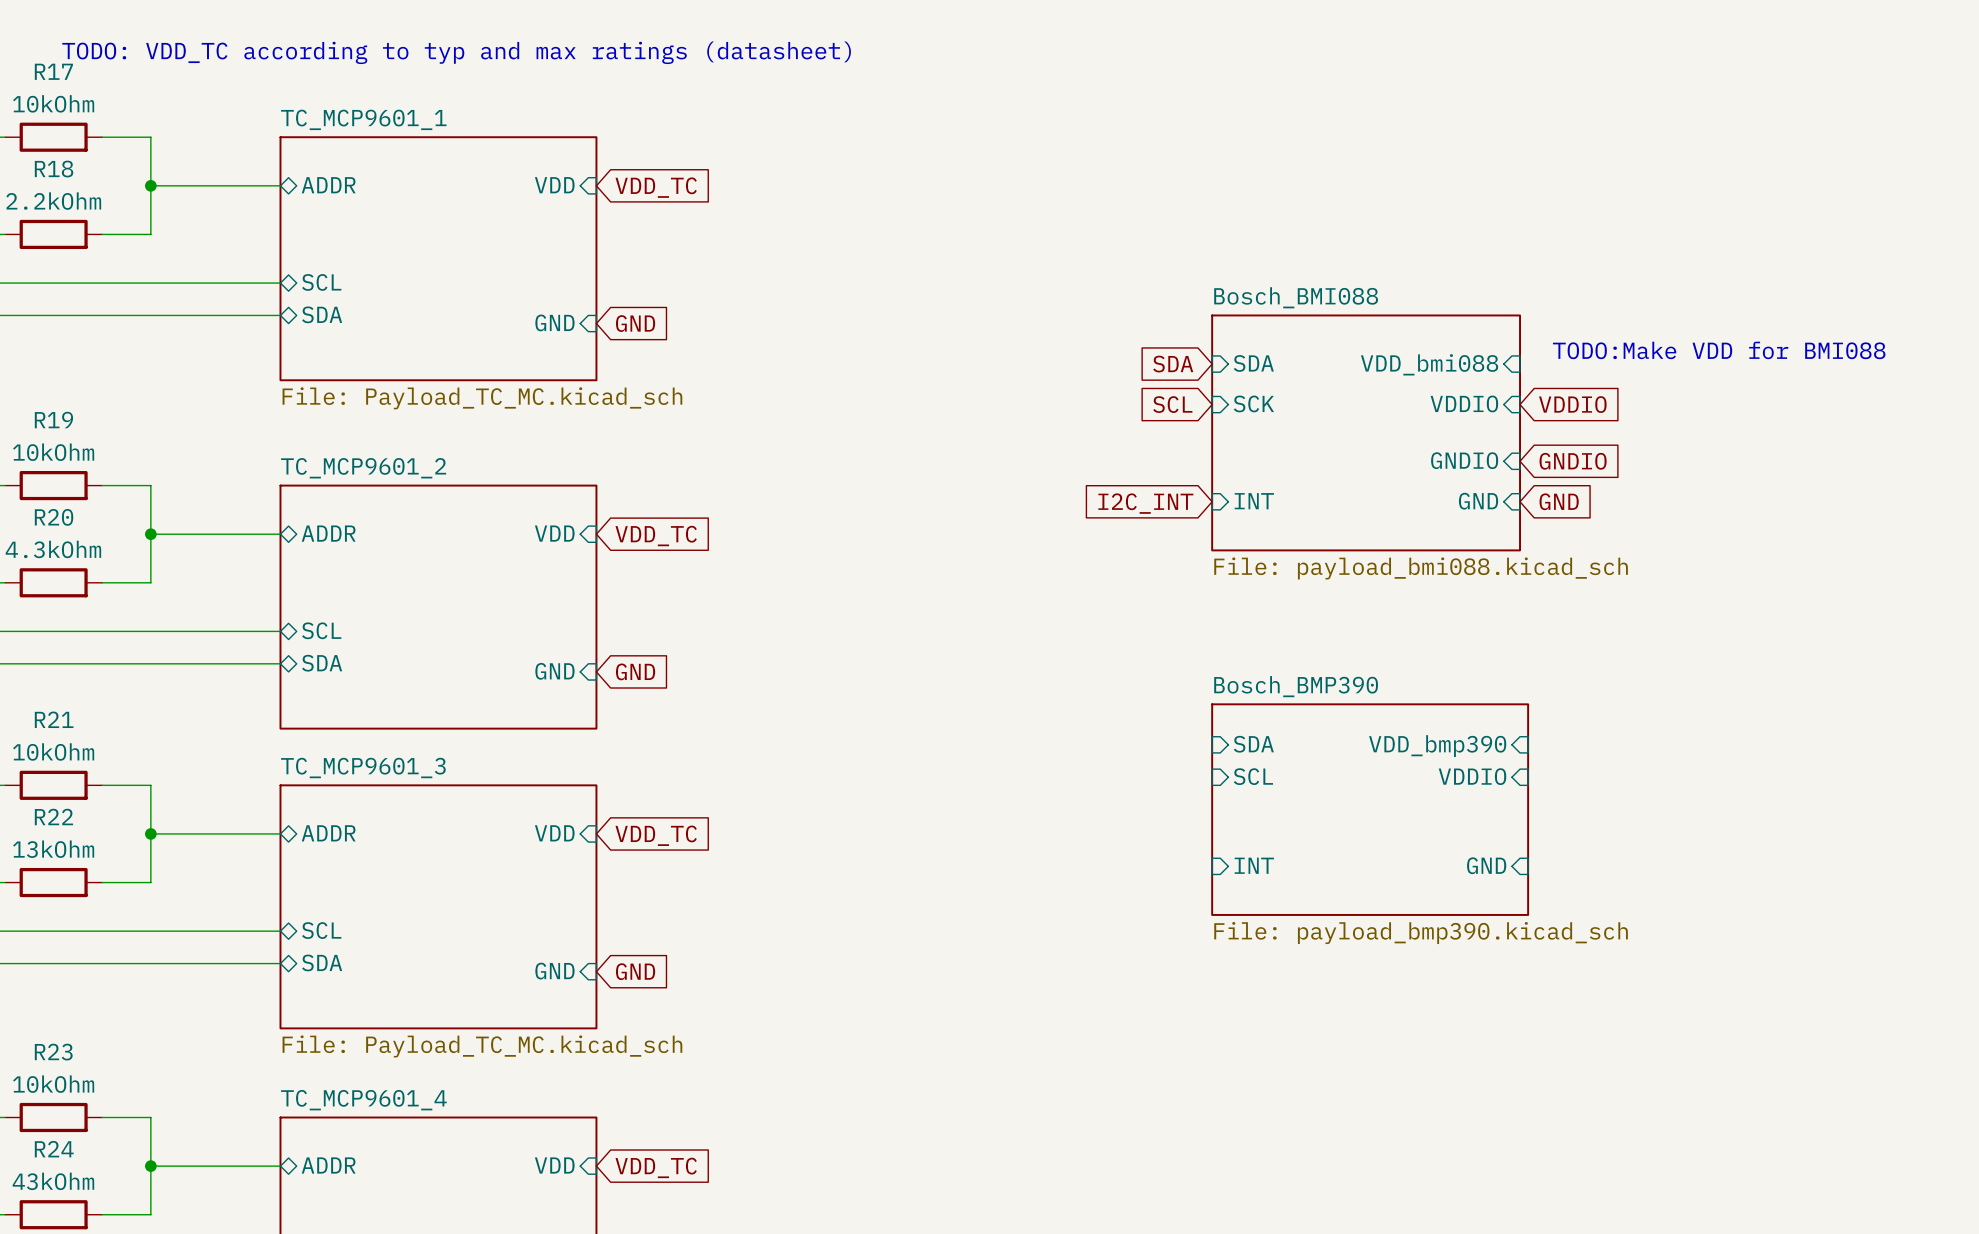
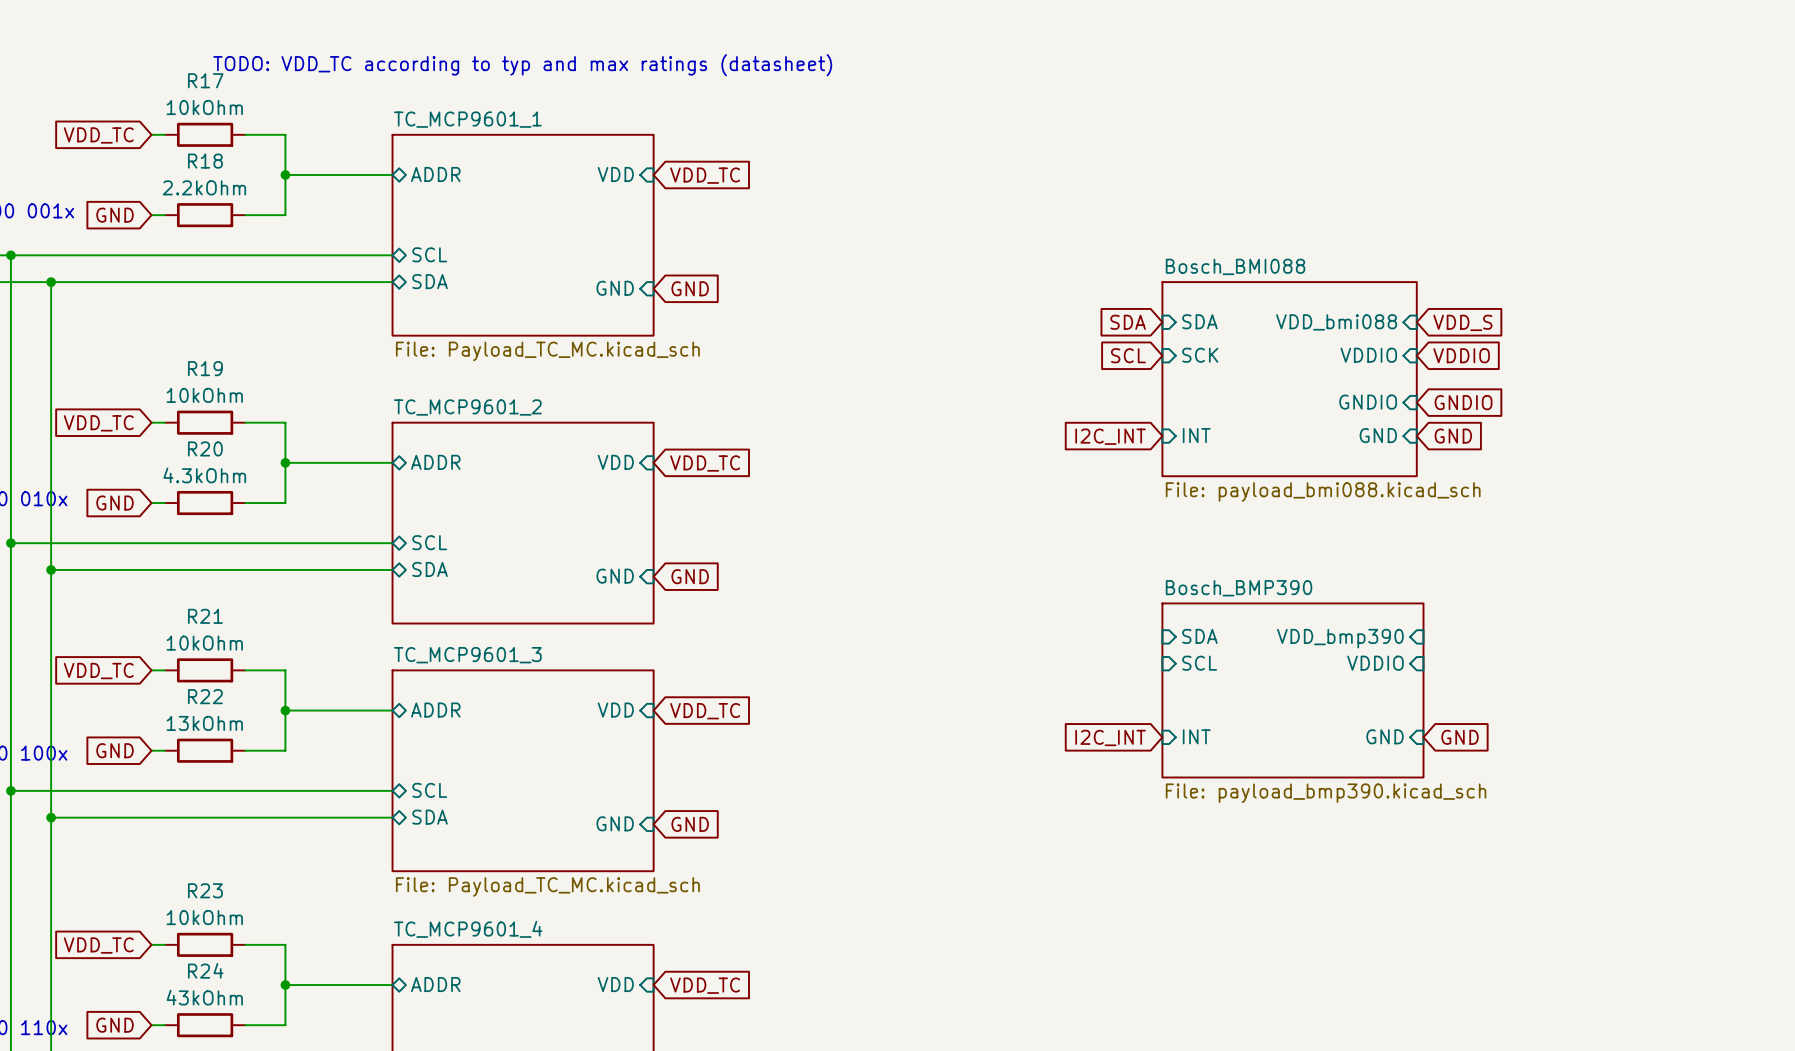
text: TODO:Make VDD for BMI088 (1719, 350) -> none
global label: none -> VDD_S (1462, 322)
global label: none -> GND (1460, 737)
global label: none -> I2C_INT (1110, 737)

